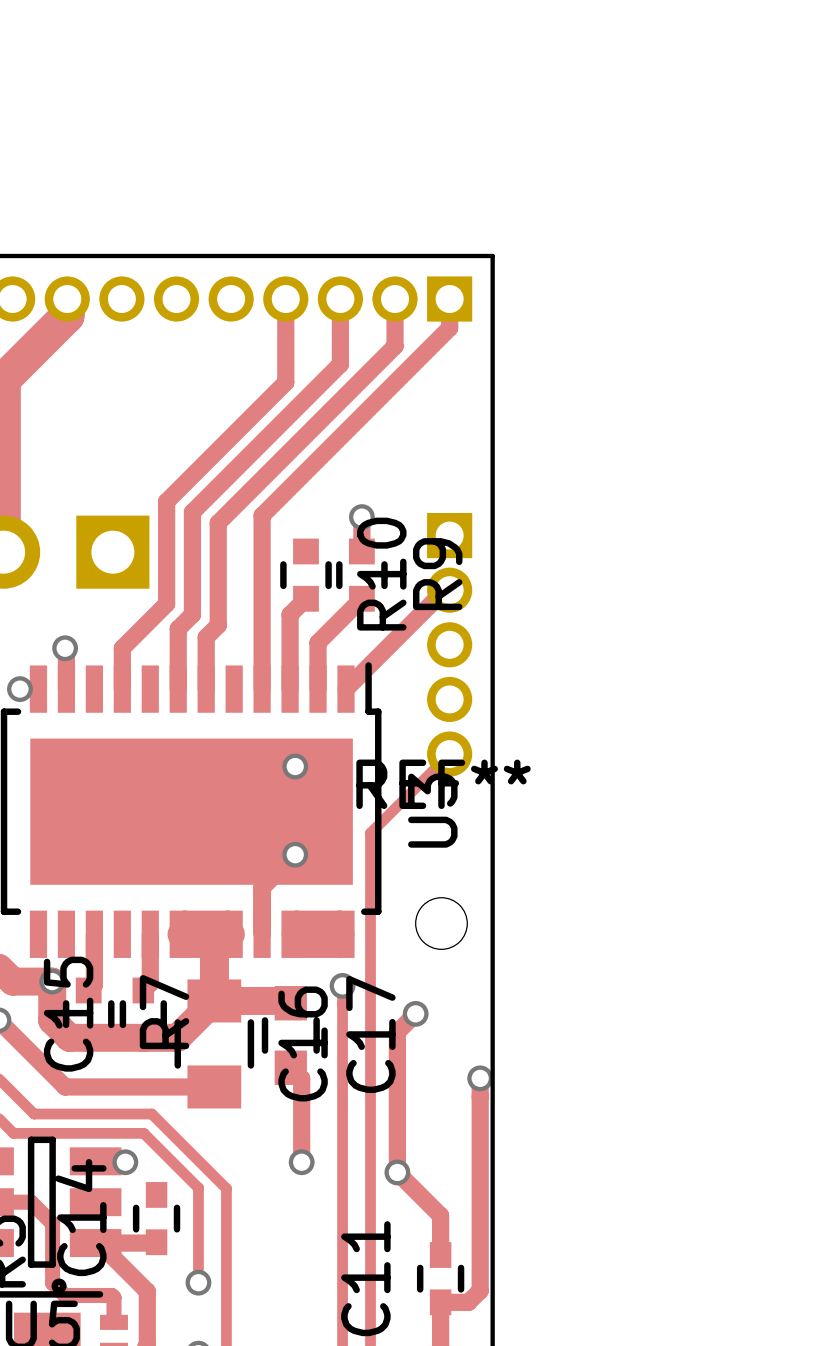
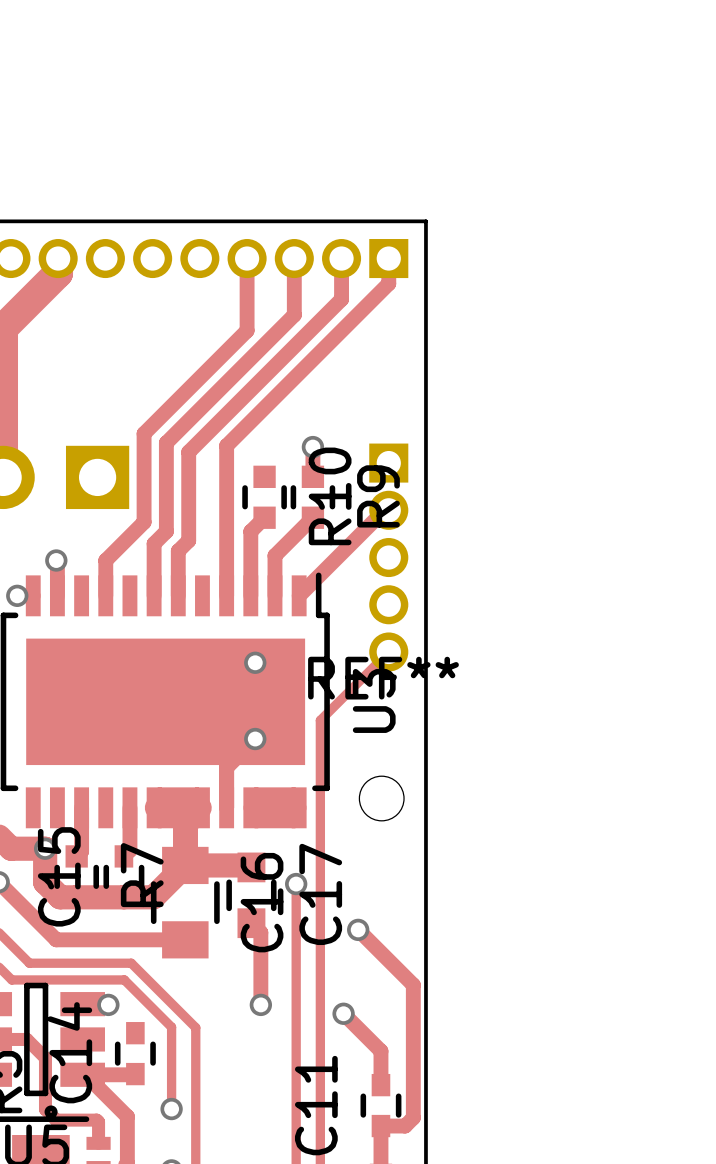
track: (342, 985) (342, 1022) -> none
via: (342, 985) -> none
track: (415, 1013) (397, 1032) (397, 1172) -> none
via: (415, 1013) -> none
via: none -> (296, 884)
via: none -> (358, 929)
track: (480, 1078) (480, 1290) (478, 1292) -> (358, 929) (413, 985) (413, 1117)
via: (480, 1078) -> none

